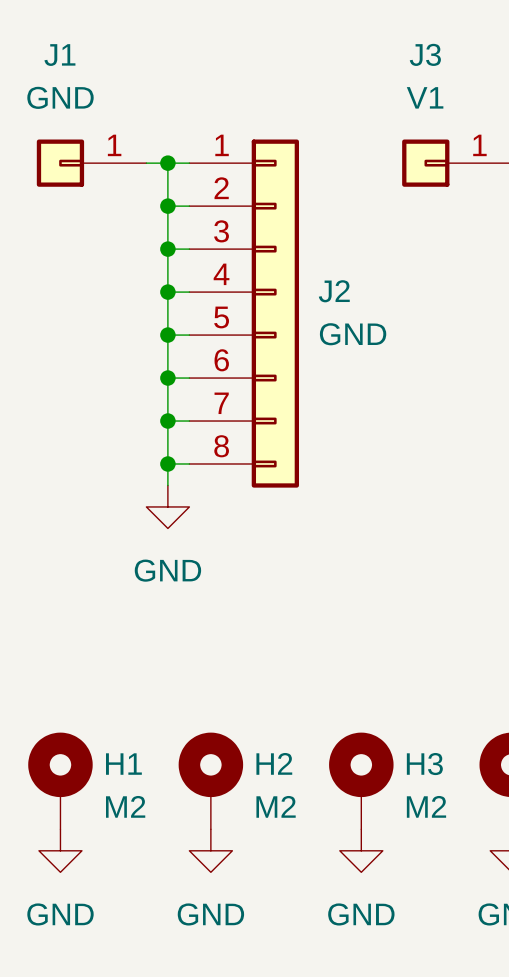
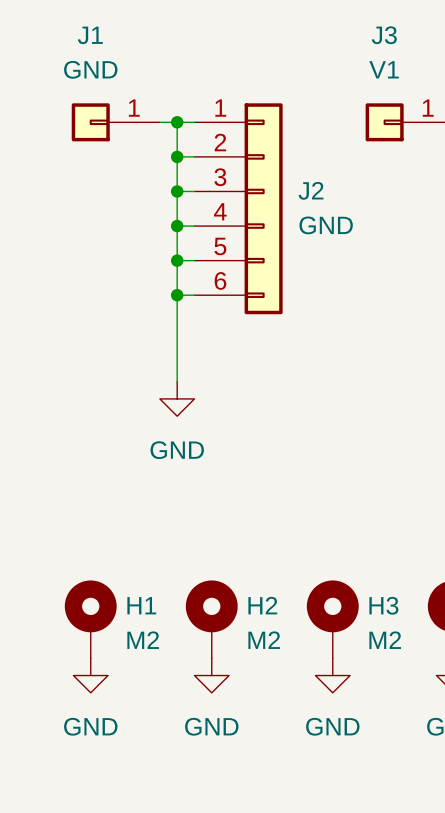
J2 symbol: [189, 139, 299, 488] -> [194, 103, 283, 315]
wire: (167, 421) (189, 421) -> none
junction: (167, 421) -> none
wire: (167, 463) (189, 463) -> none
junction: (167, 463) -> none

